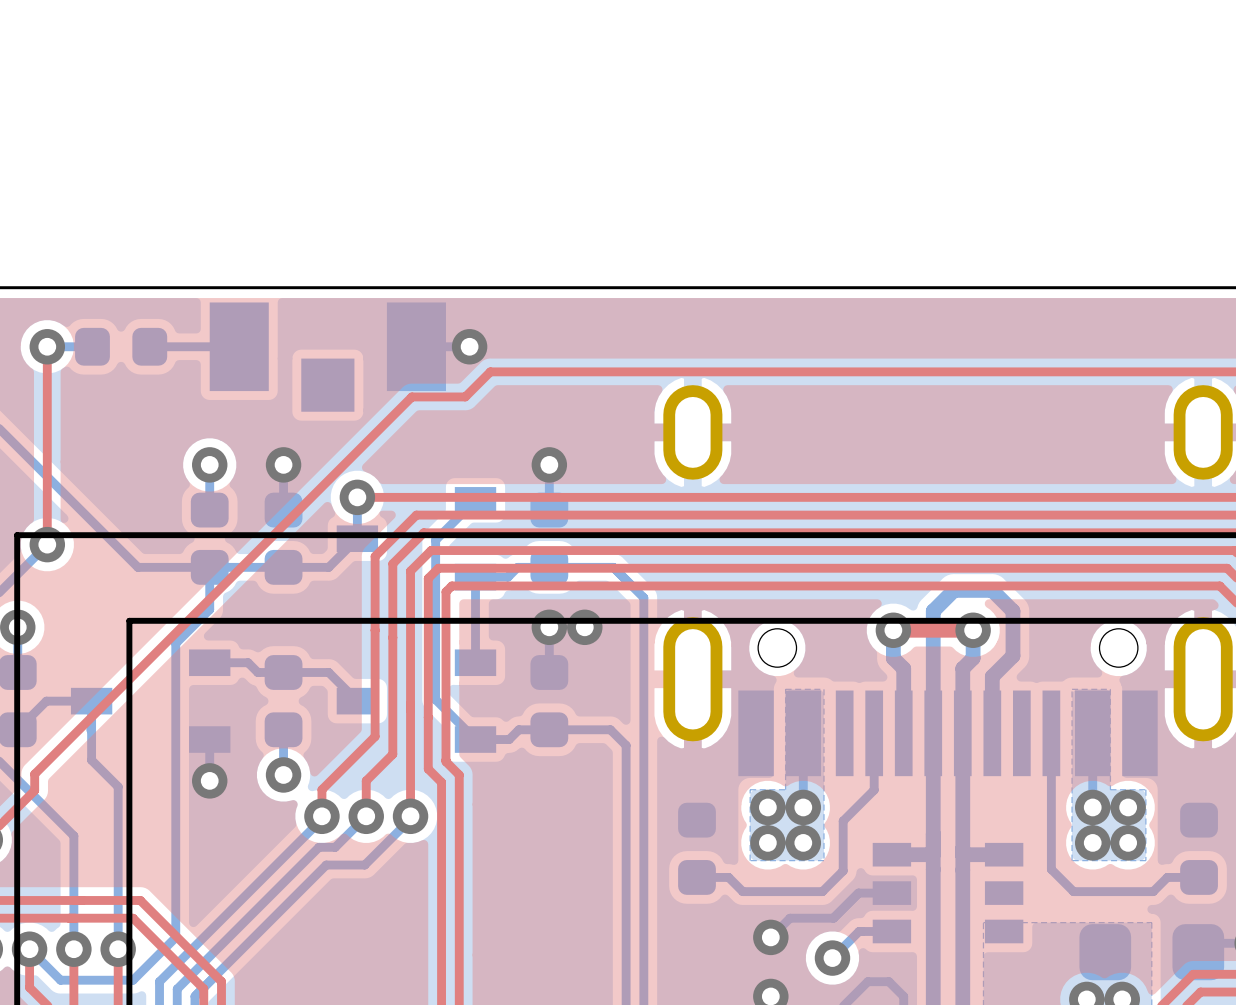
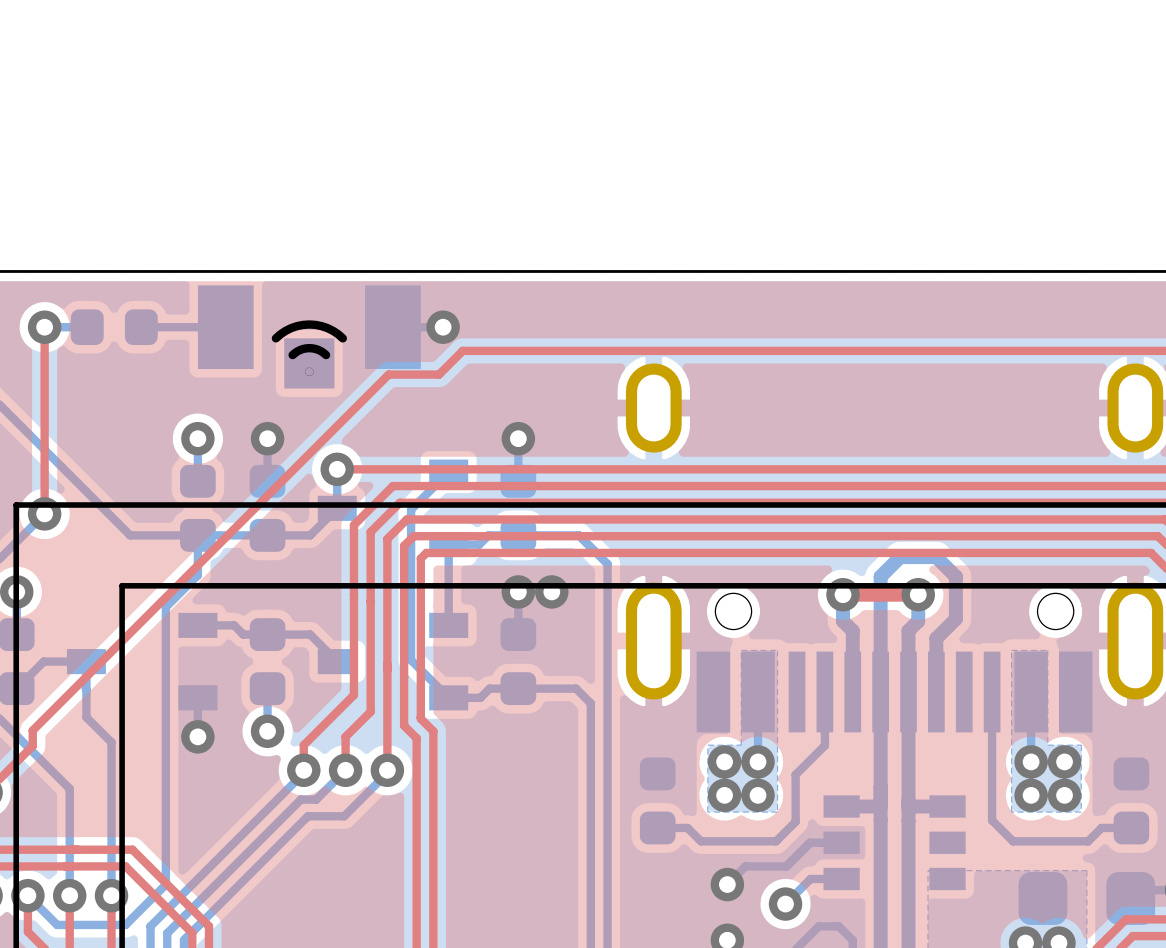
line: none -> (275, 338) (291, 328) (309, 324) (327, 328) (342, 338)
line: none -> (292, 355) (300, 349) (309, 348) (318, 349) (326, 355)

